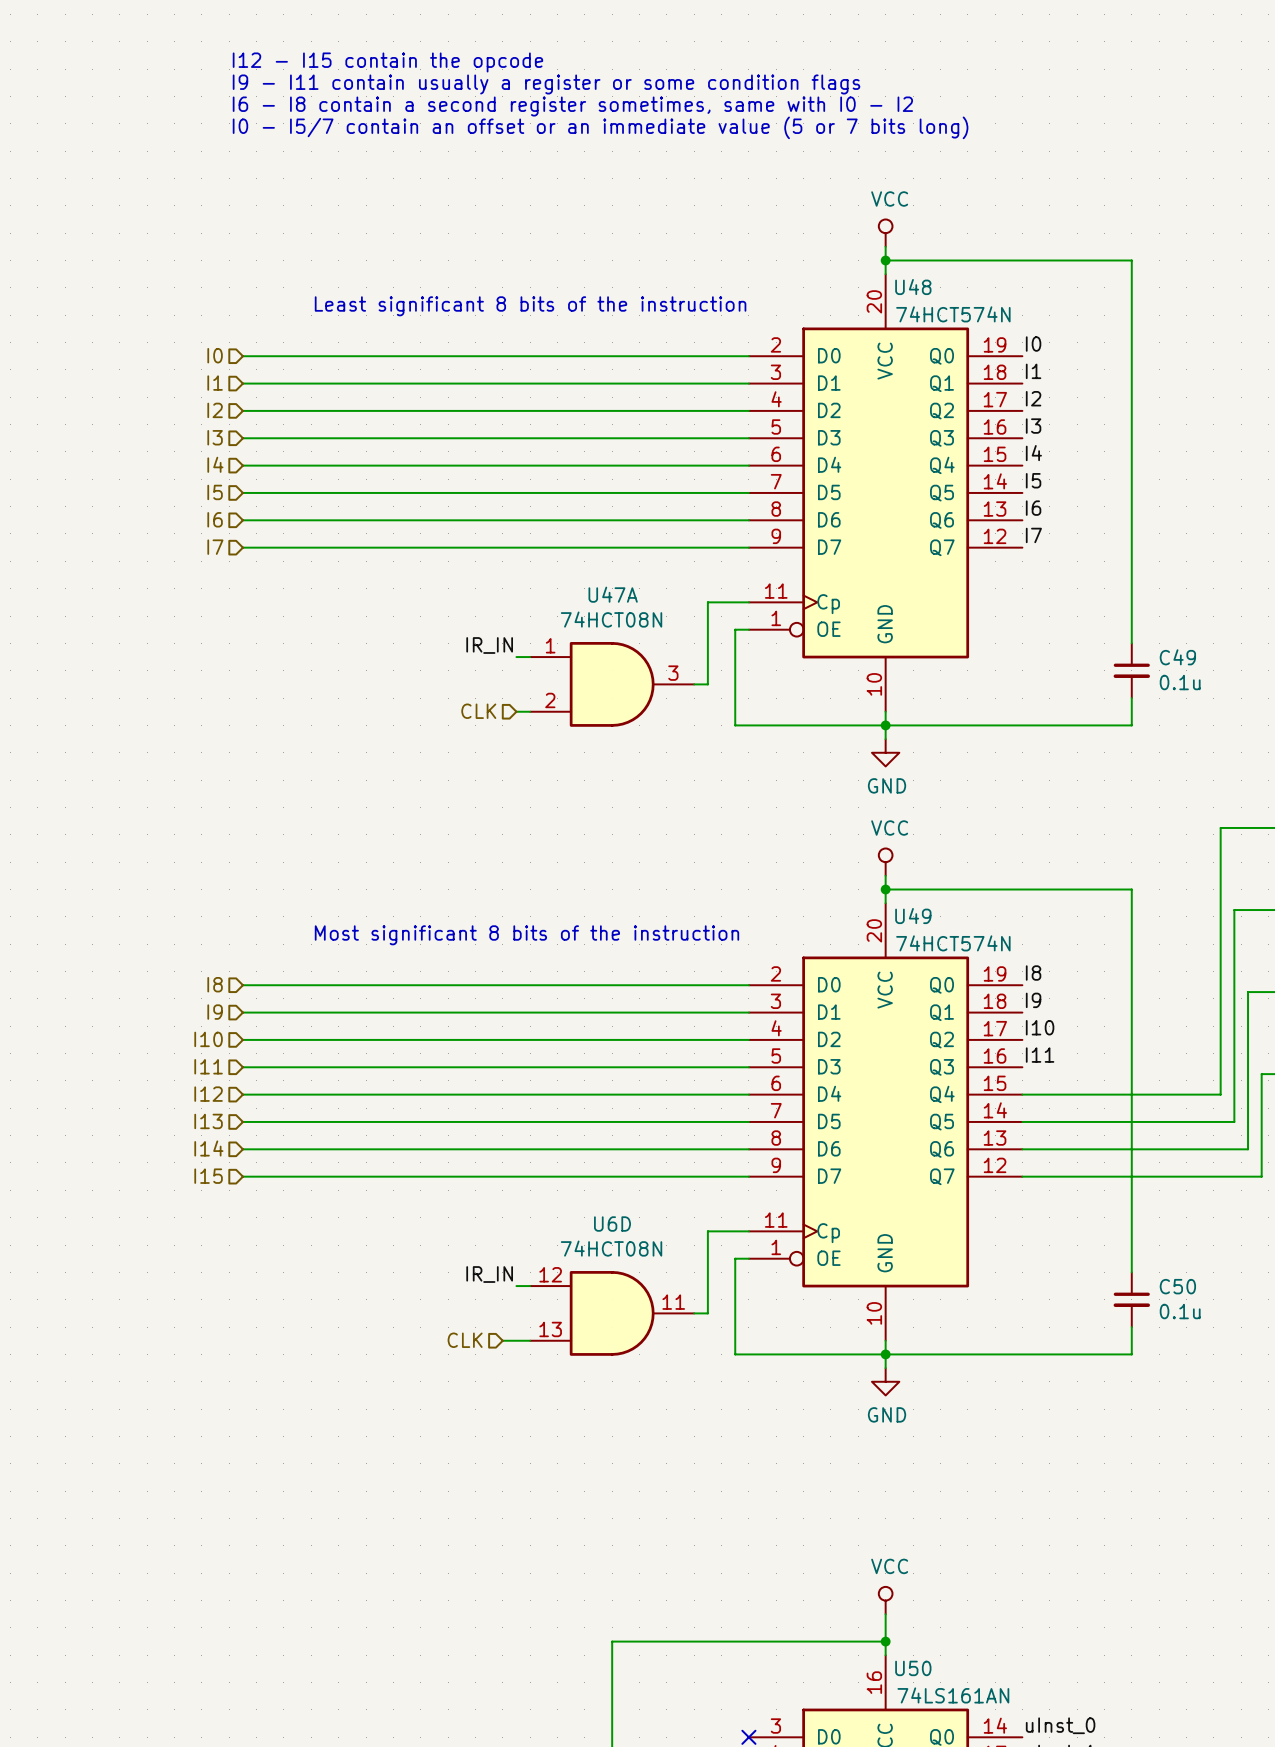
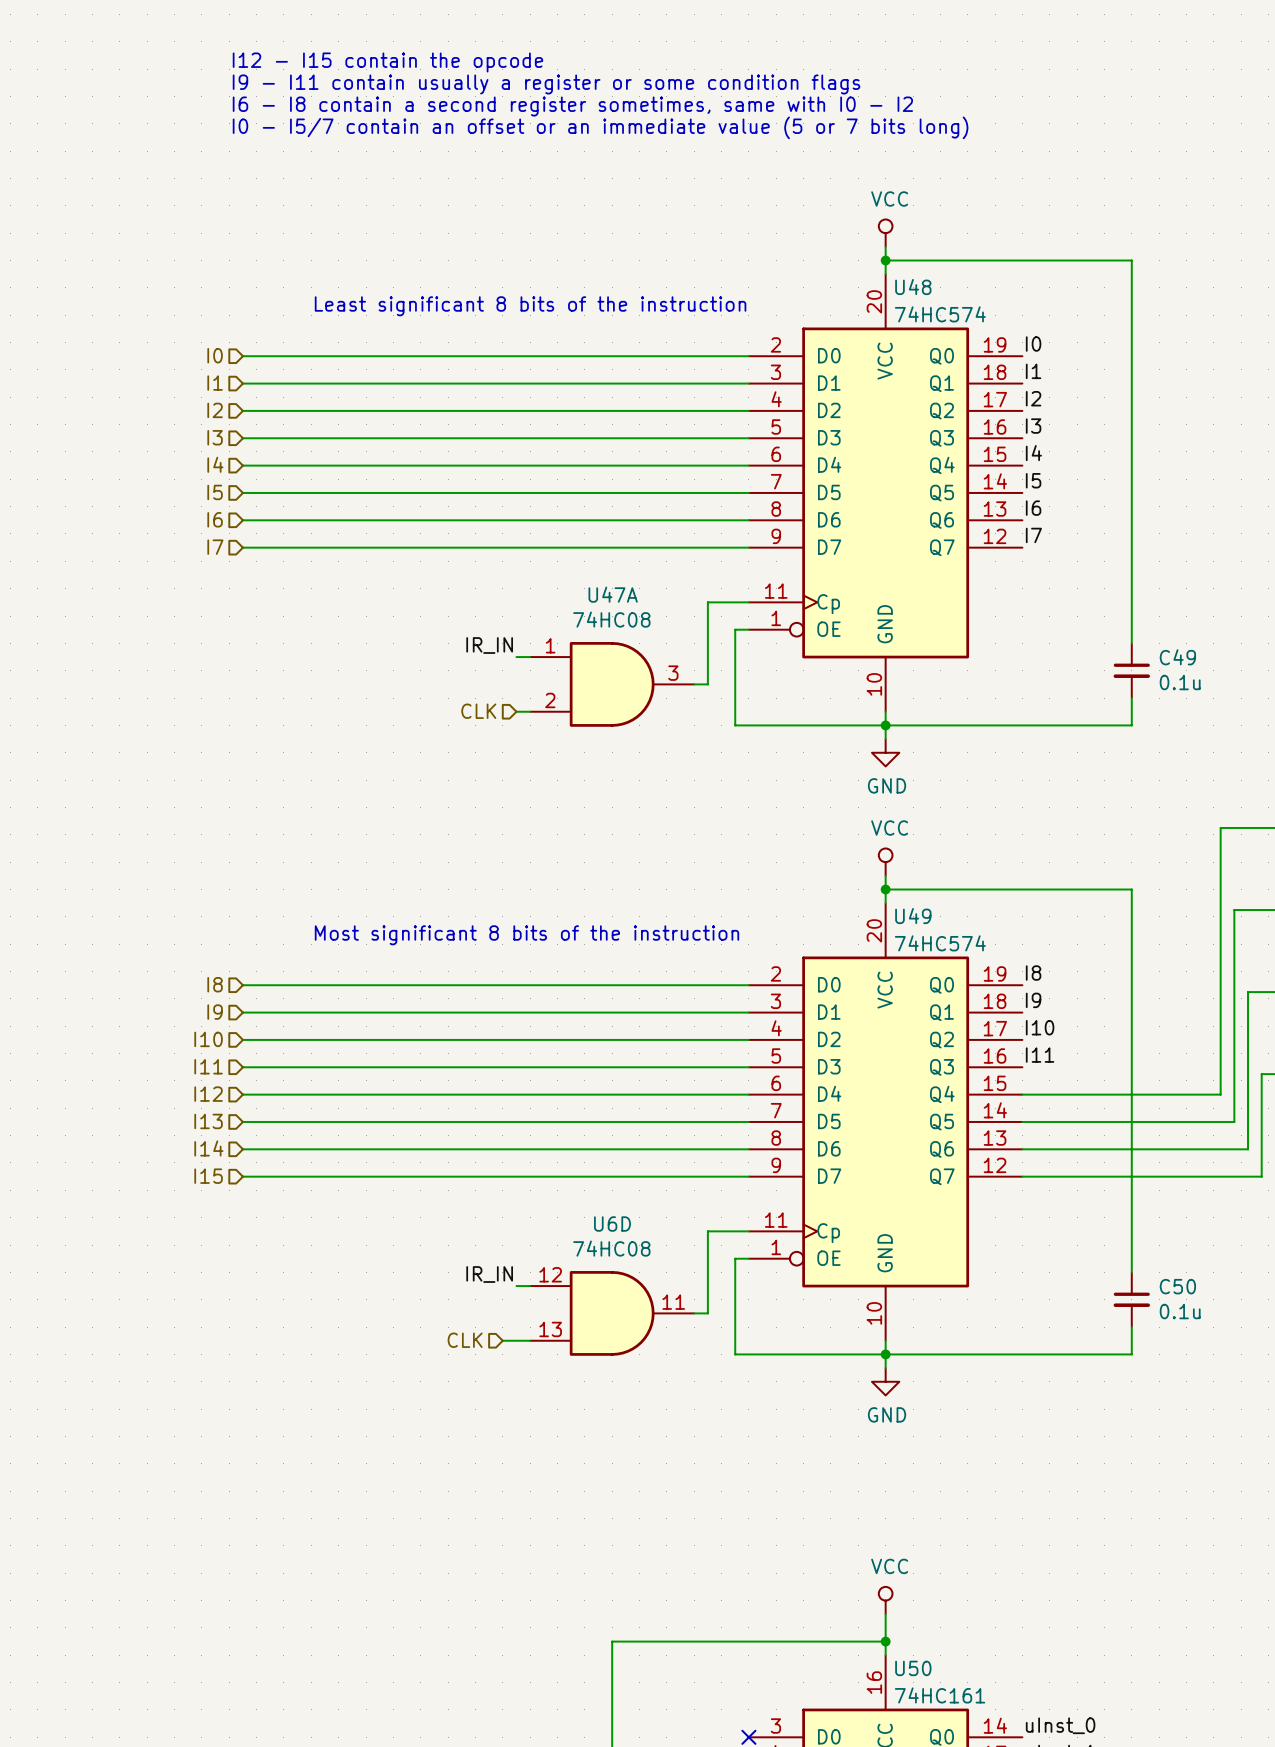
U48 value: 74HCT574N (953, 314) -> 74HC574 (940, 314)
U47A value: 74HCT08N (611, 619) -> 74HC08 (611, 619)
U49 value: 74HCT574N (953, 943) -> 74HC574 (940, 943)
U6D value: 74HCT08N (611, 1248) -> 74HC08 (611, 1248)
U50 value: 74LS161AN (953, 1695) -> 74HC161 (940, 1695)

